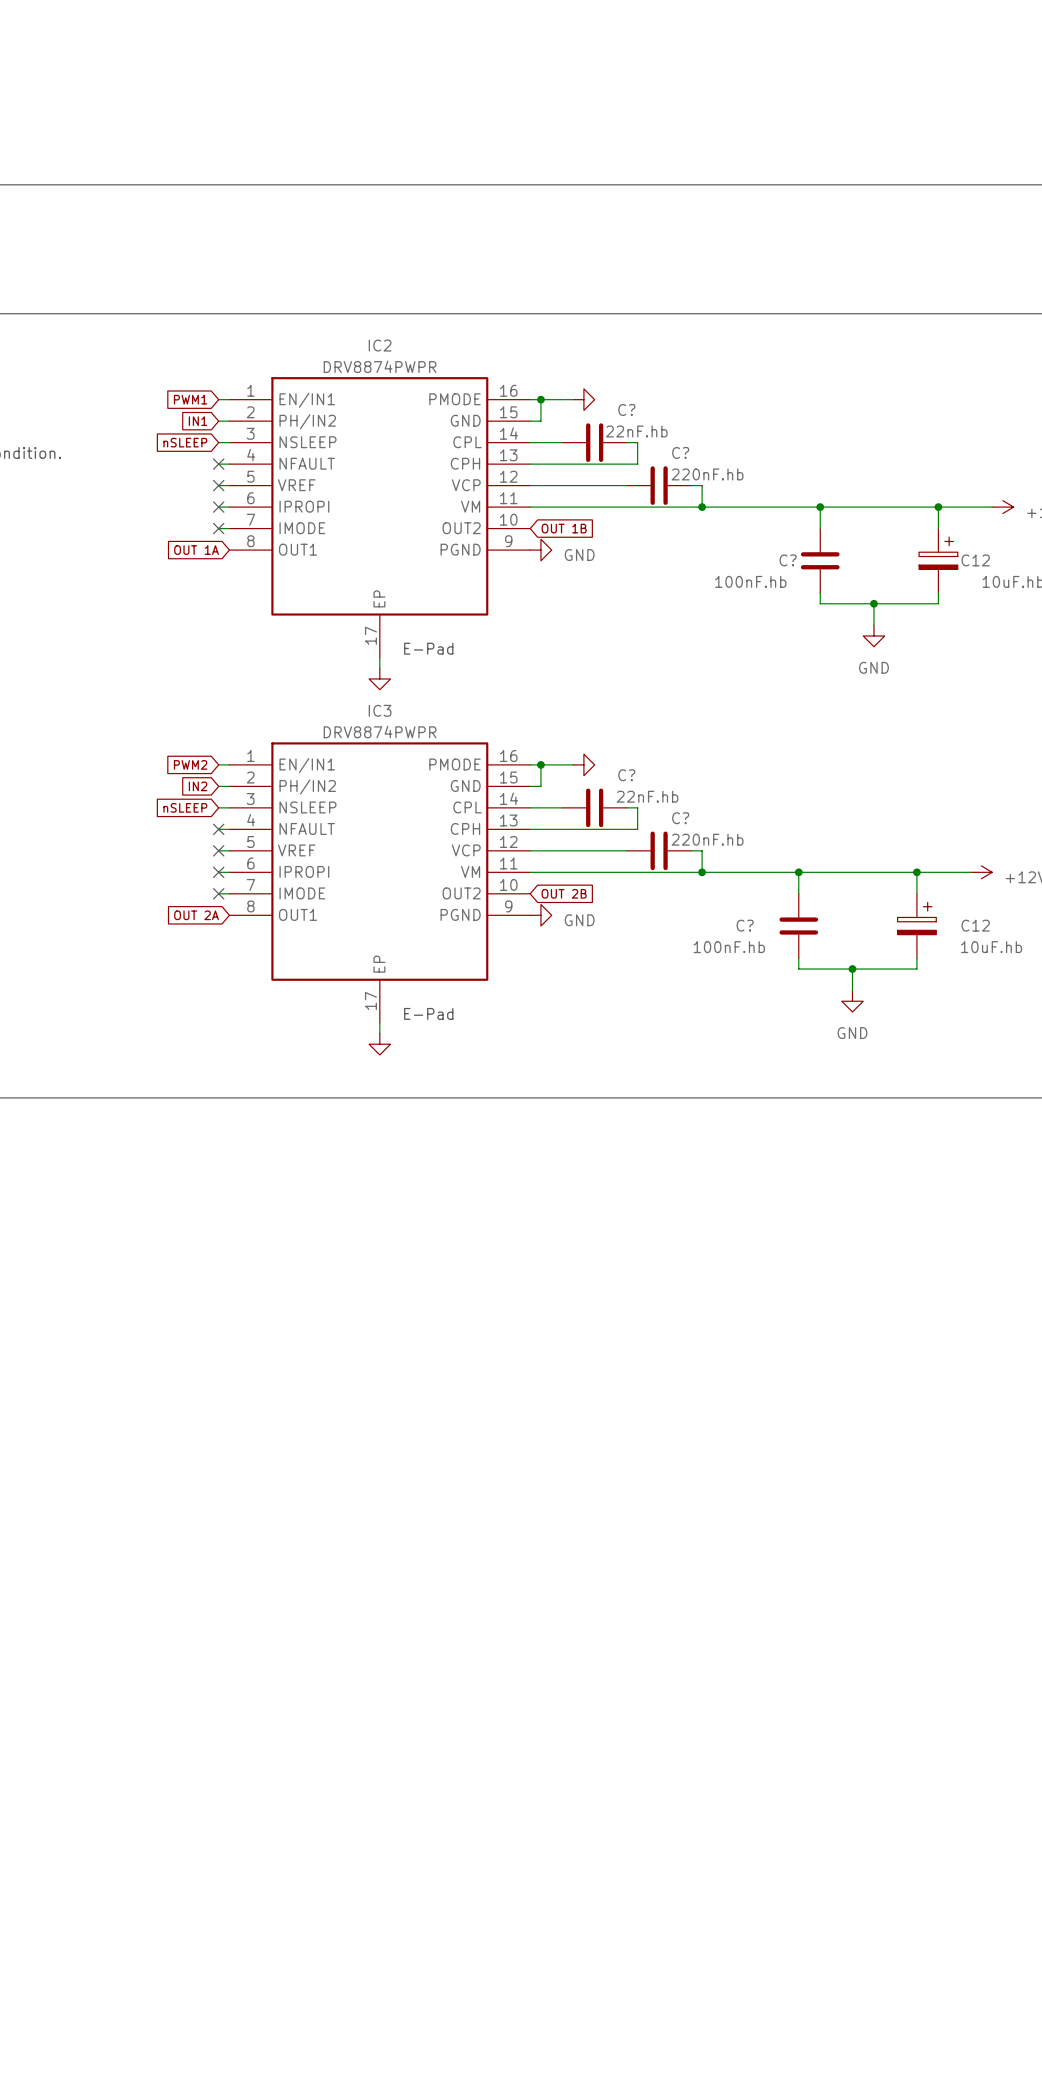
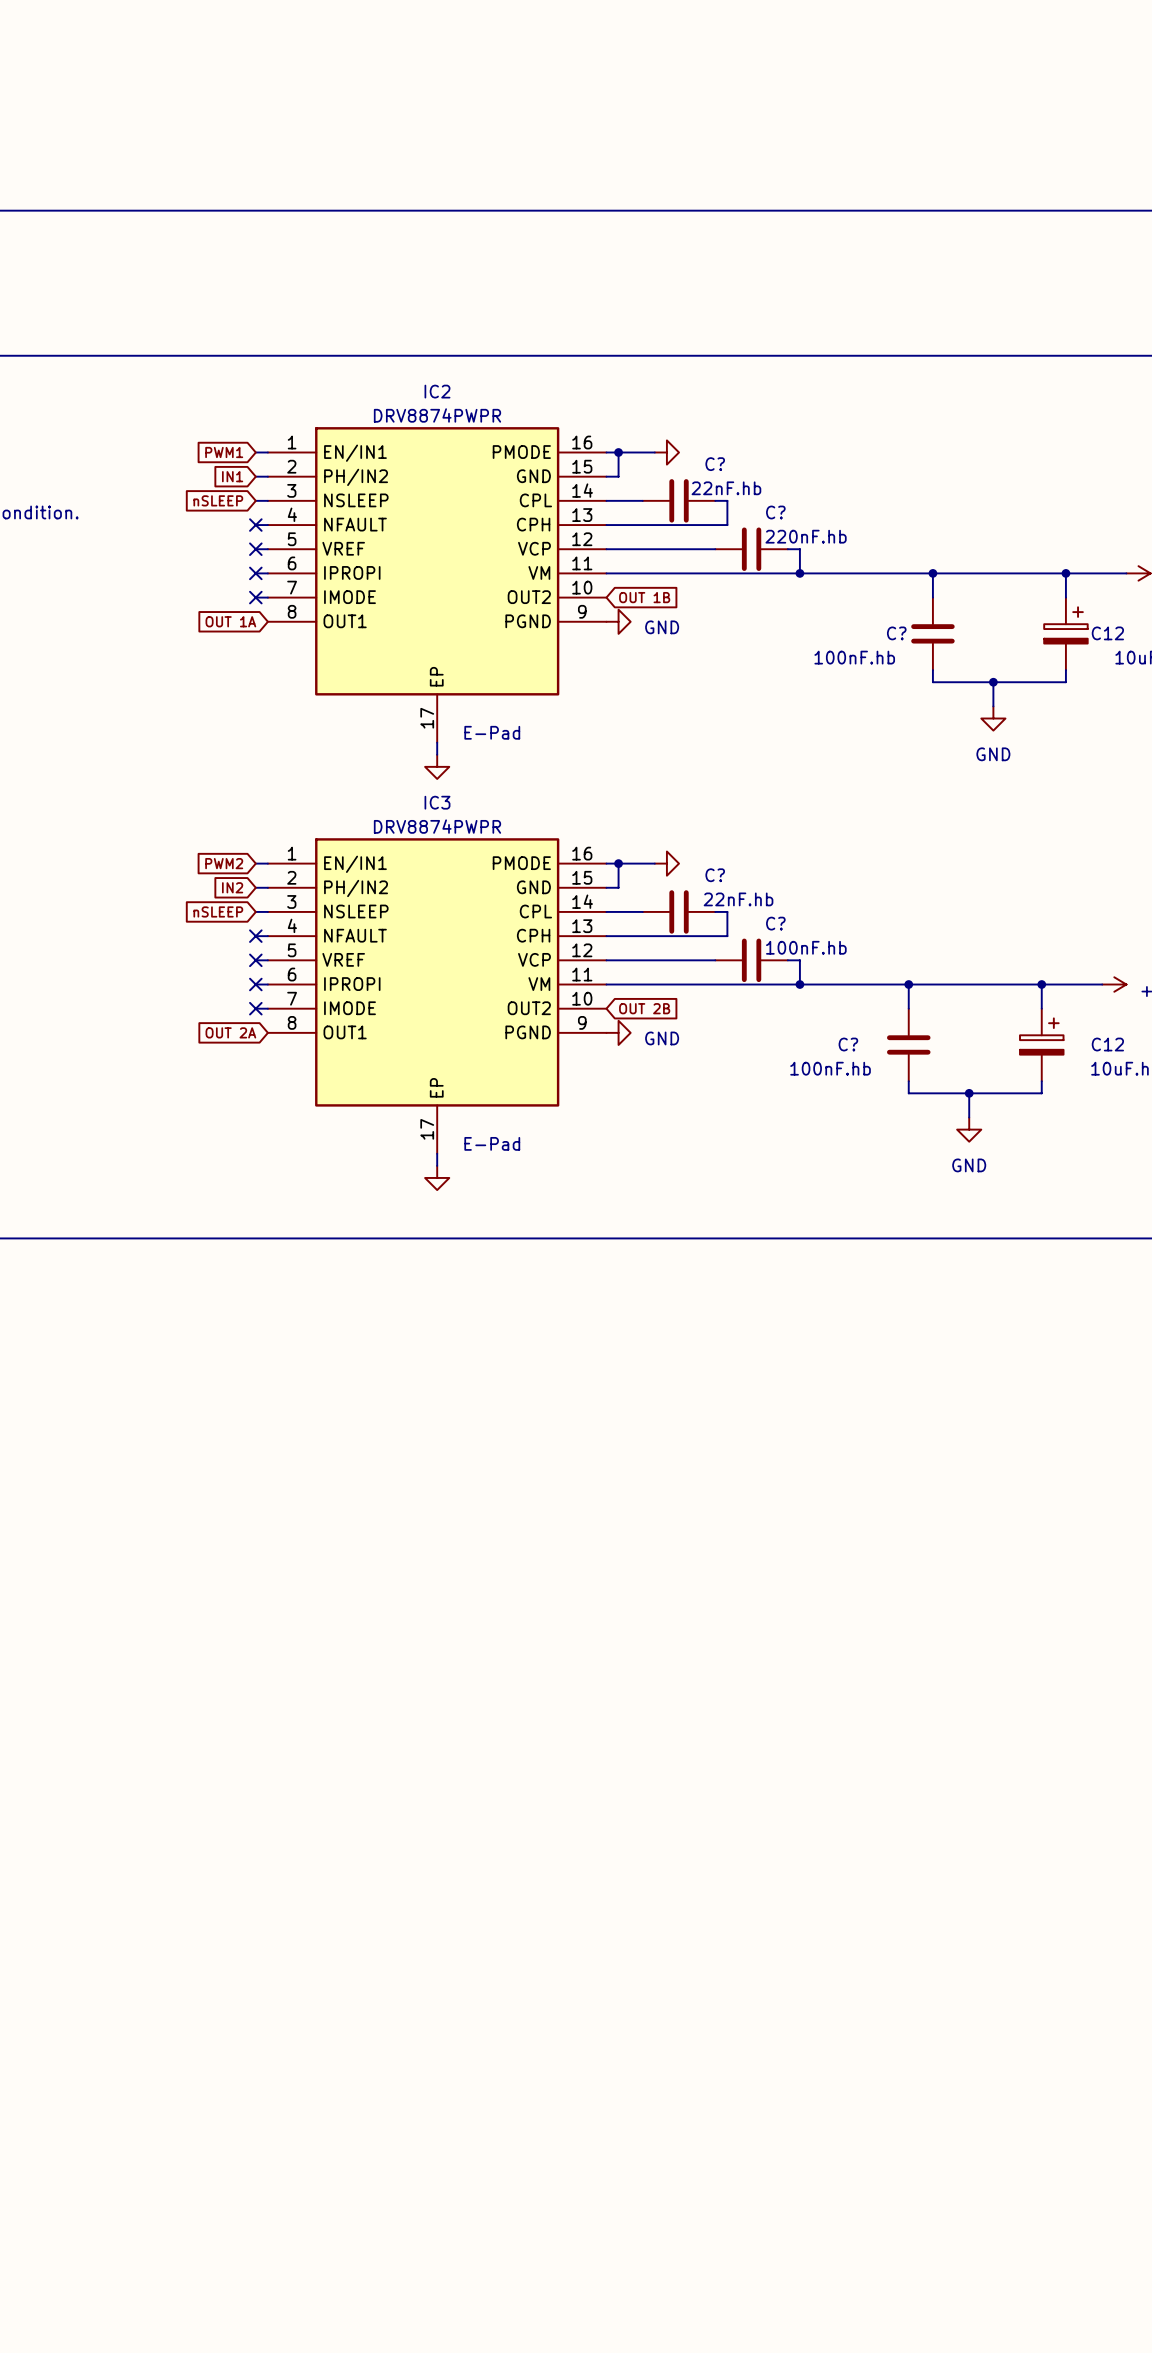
C? value: 220nF.hb (707, 839) -> 100nF.hb (806, 947)

